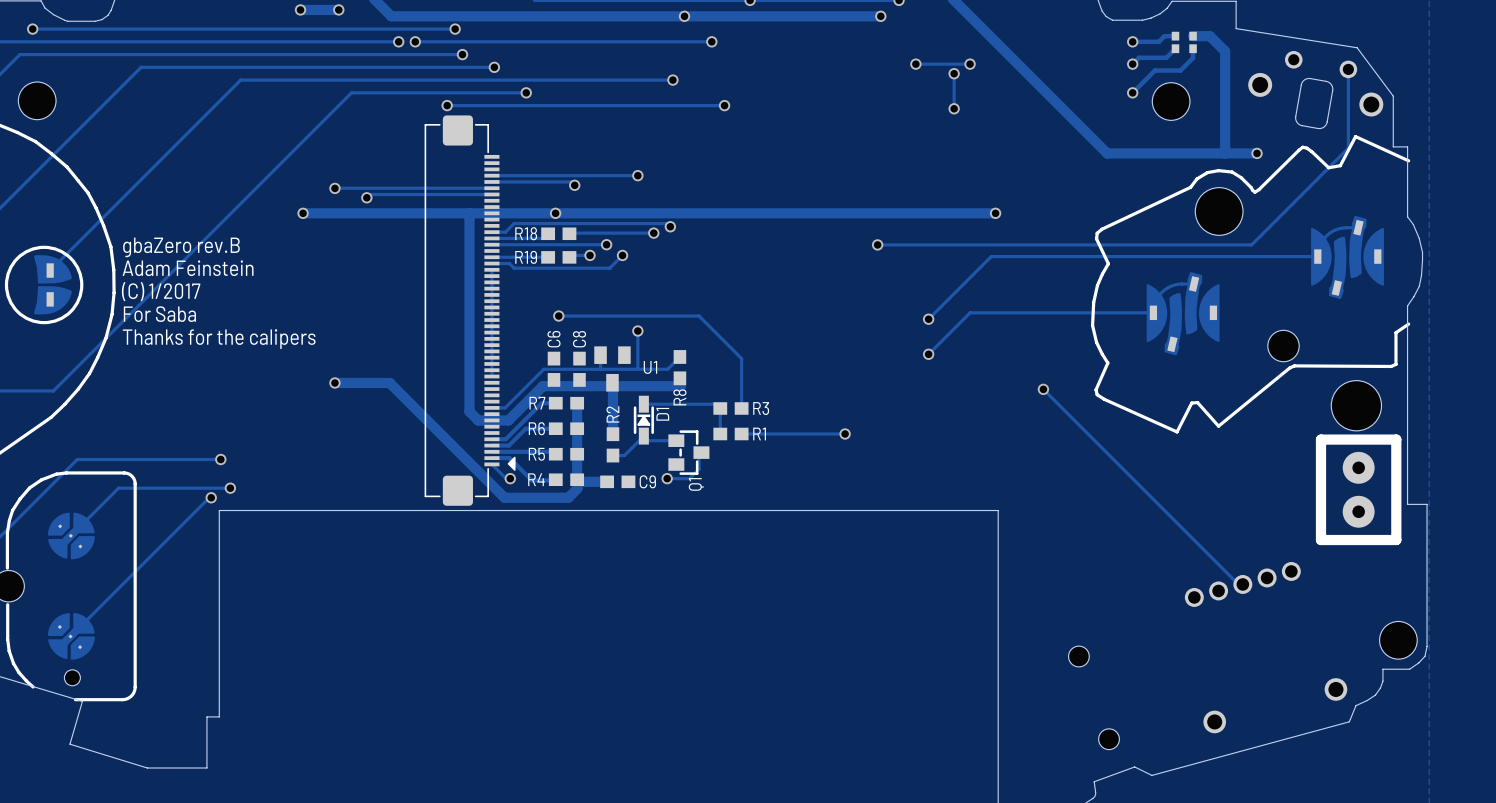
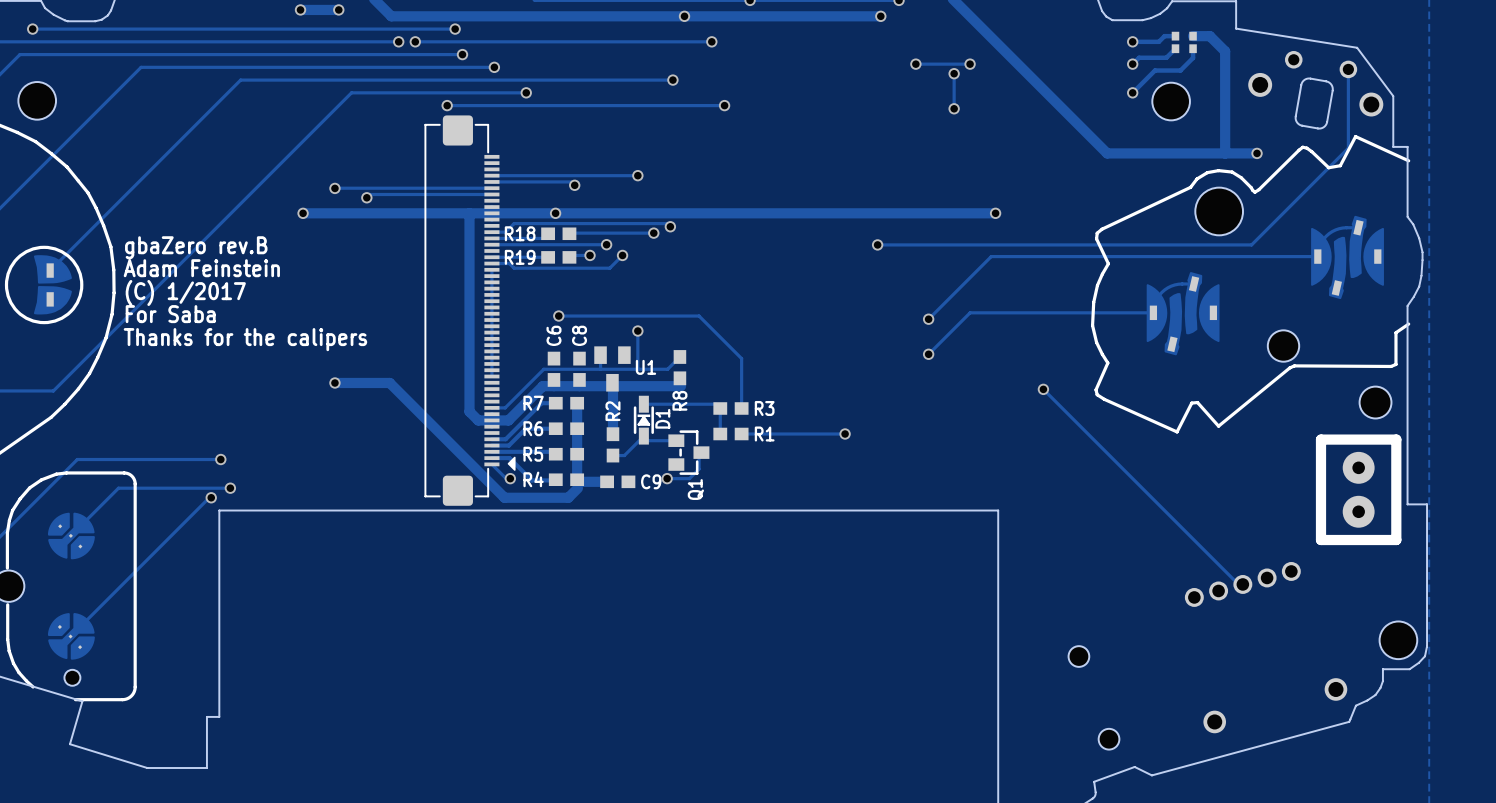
hole: none -> (1375, 402)
hole: (1356, 405) -> none

